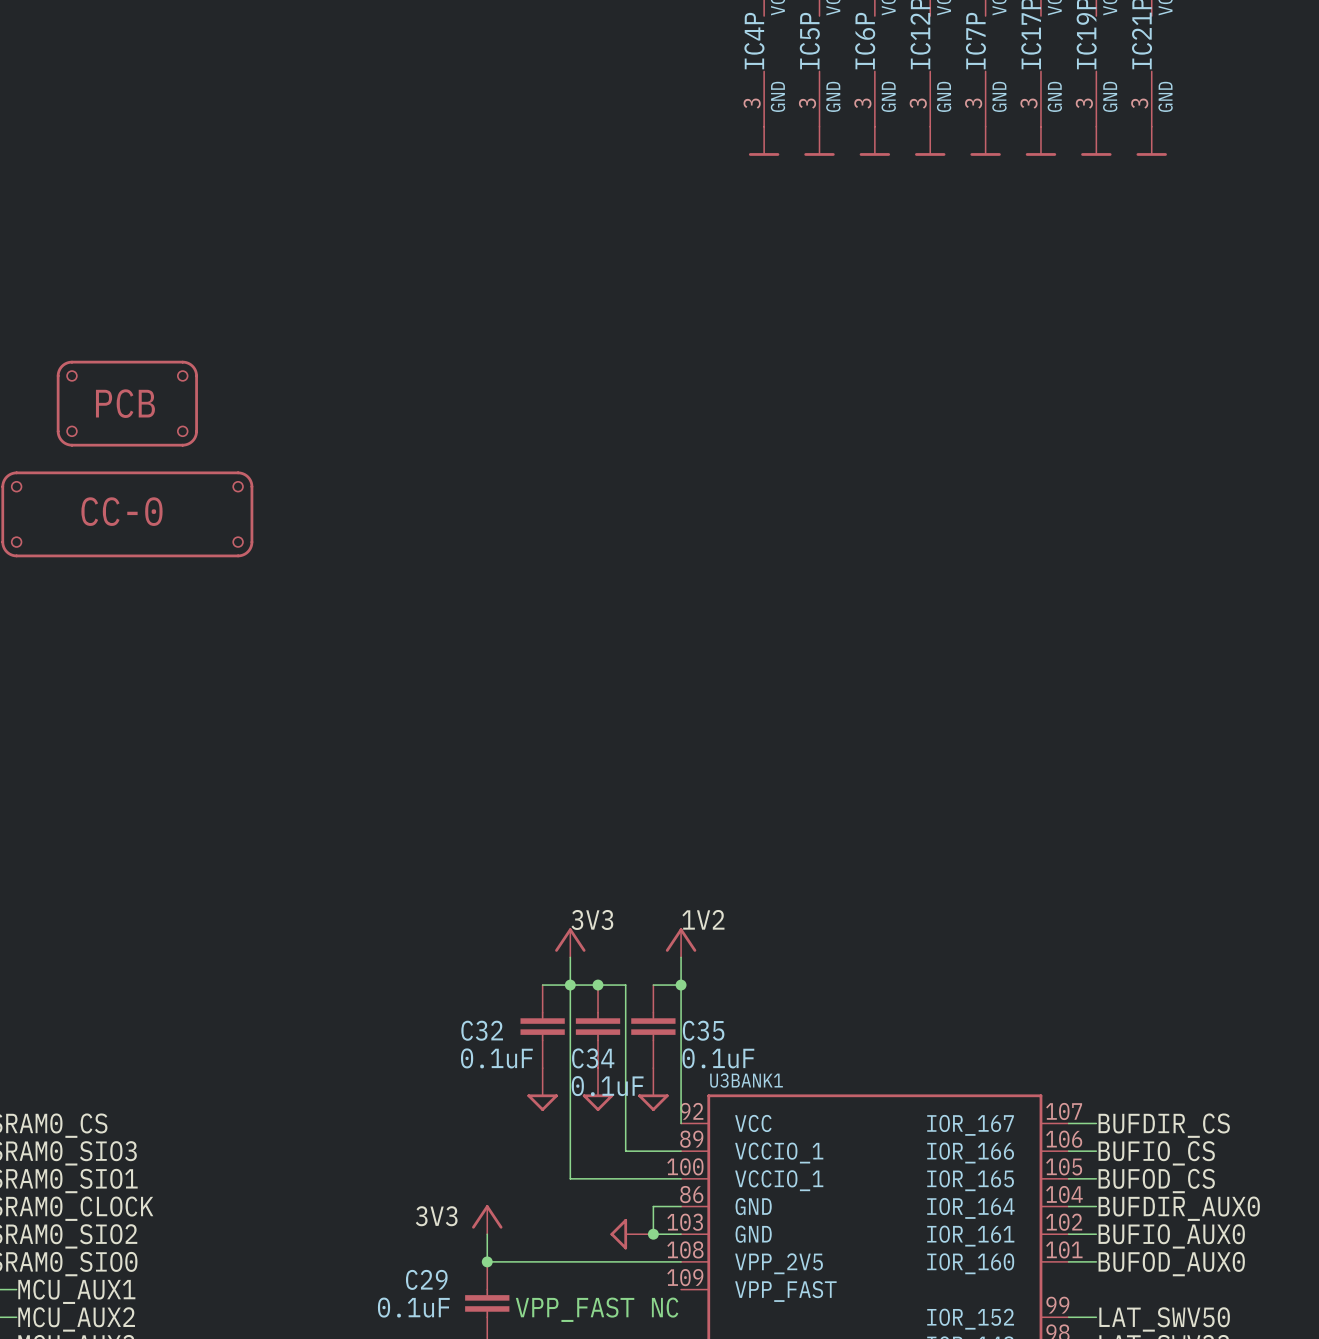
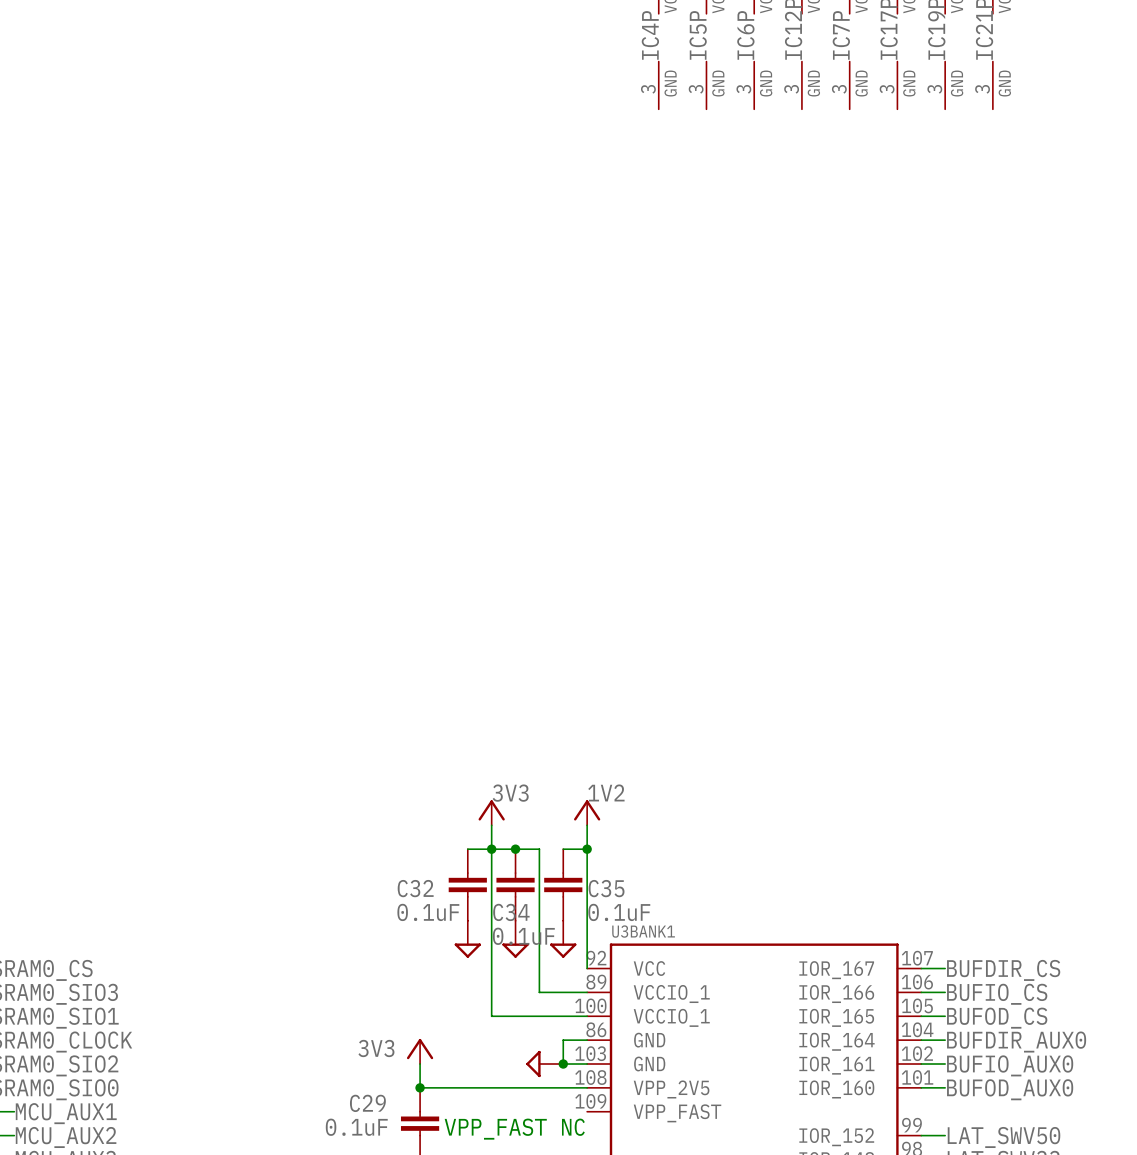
power symbol: (764, 141) -> none
power symbol: (819, 141) -> none
power symbol: (874, 141) -> none
power symbol: (930, 141) -> none
power symbol: (985, 141) -> none
power symbol: (1040, 141) -> none
power symbol: (1096, 141) -> none
power symbol: (1151, 141) -> none
part: (127, 403) -> none
part: (127, 514) -> none

